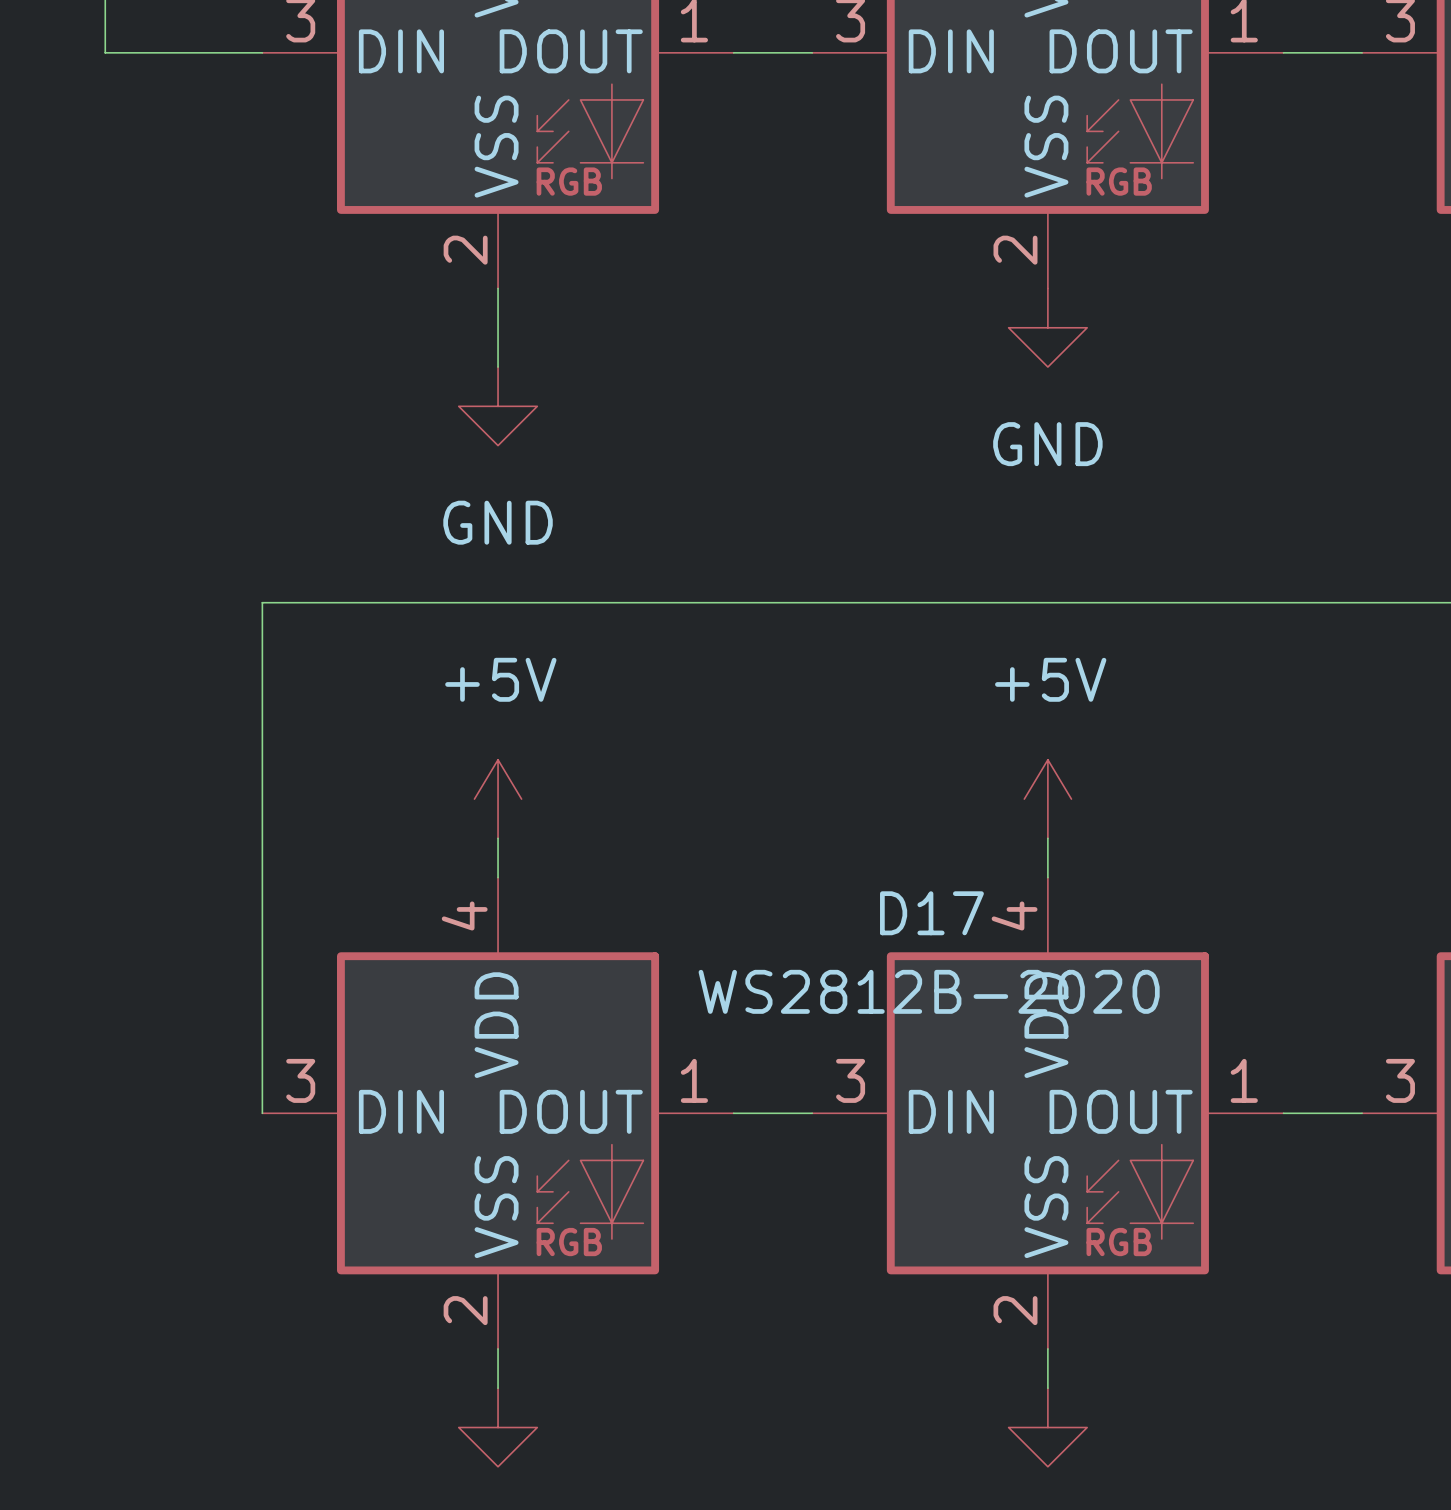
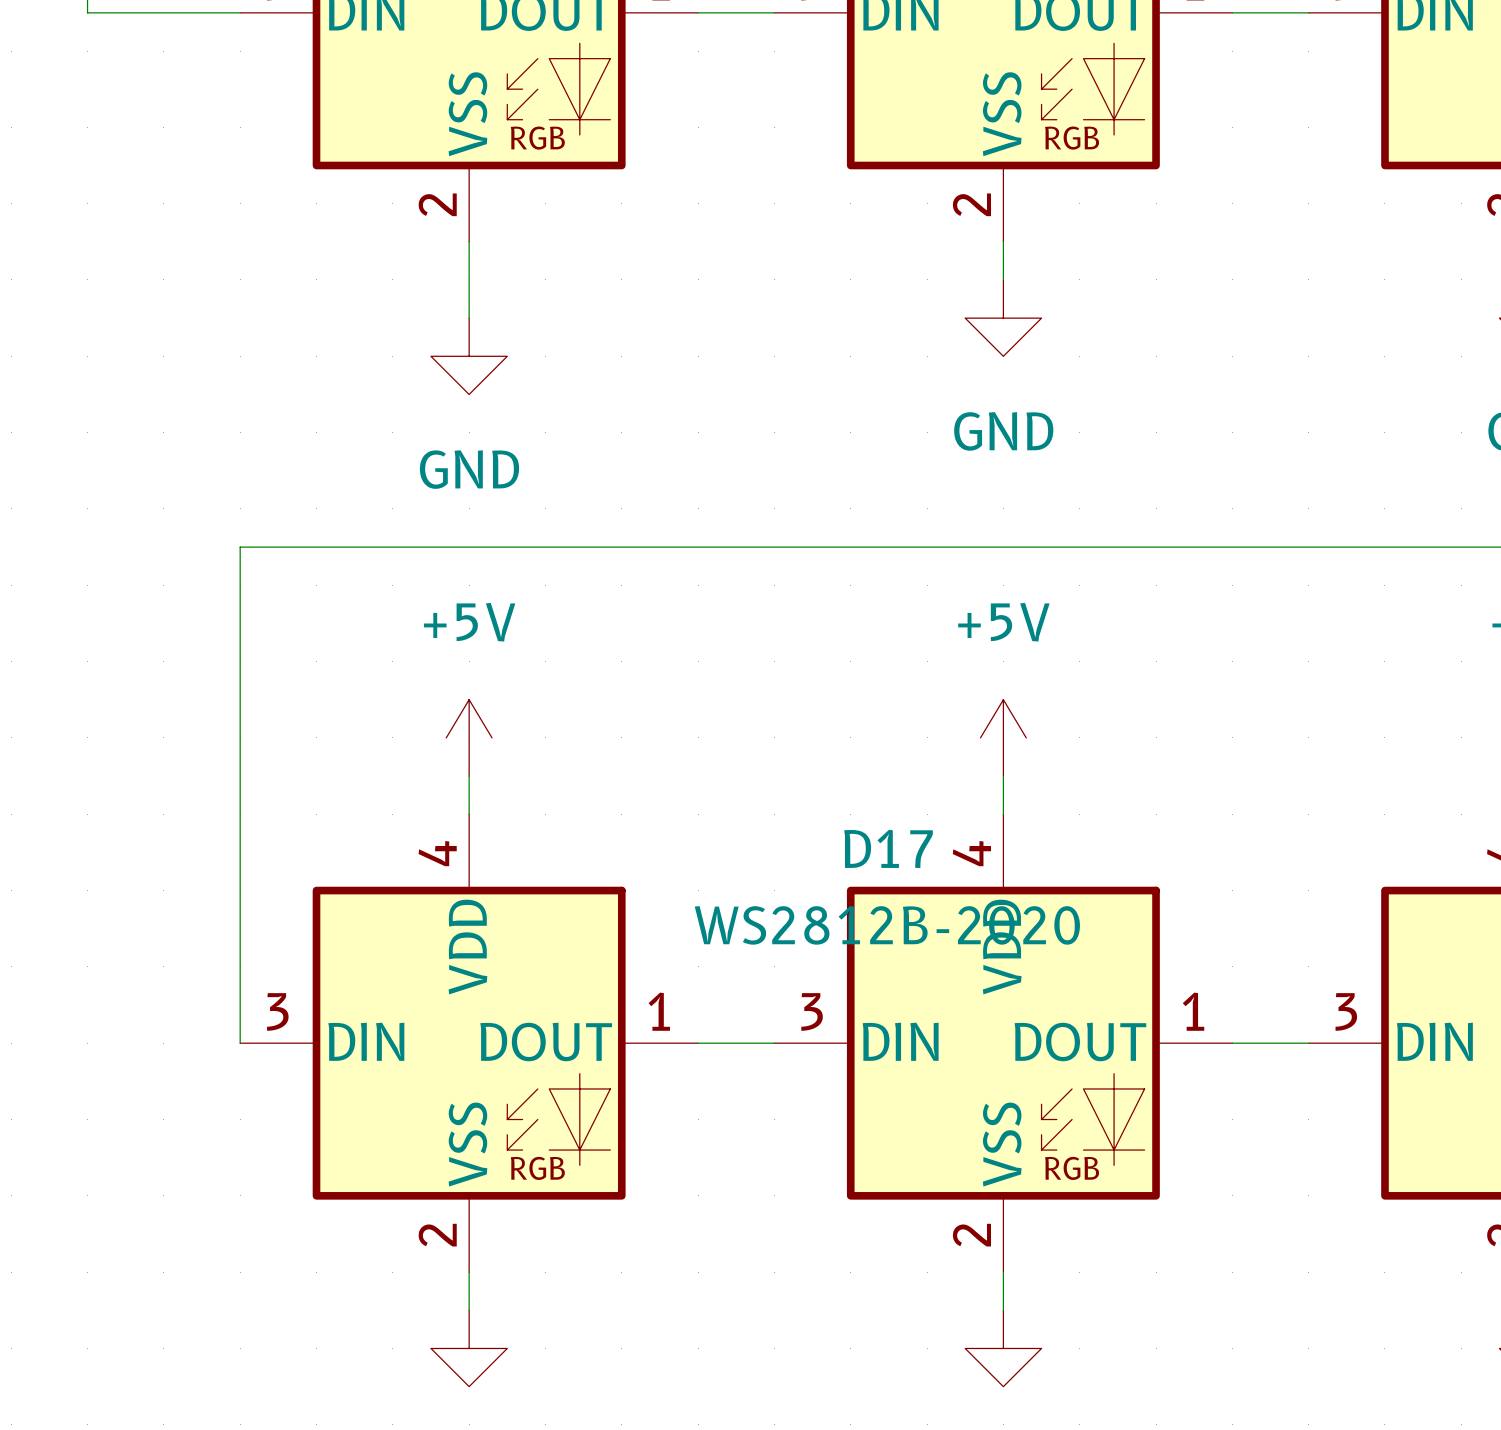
power symbol position: GND (1047, 327) -> GND (1003, 318)

